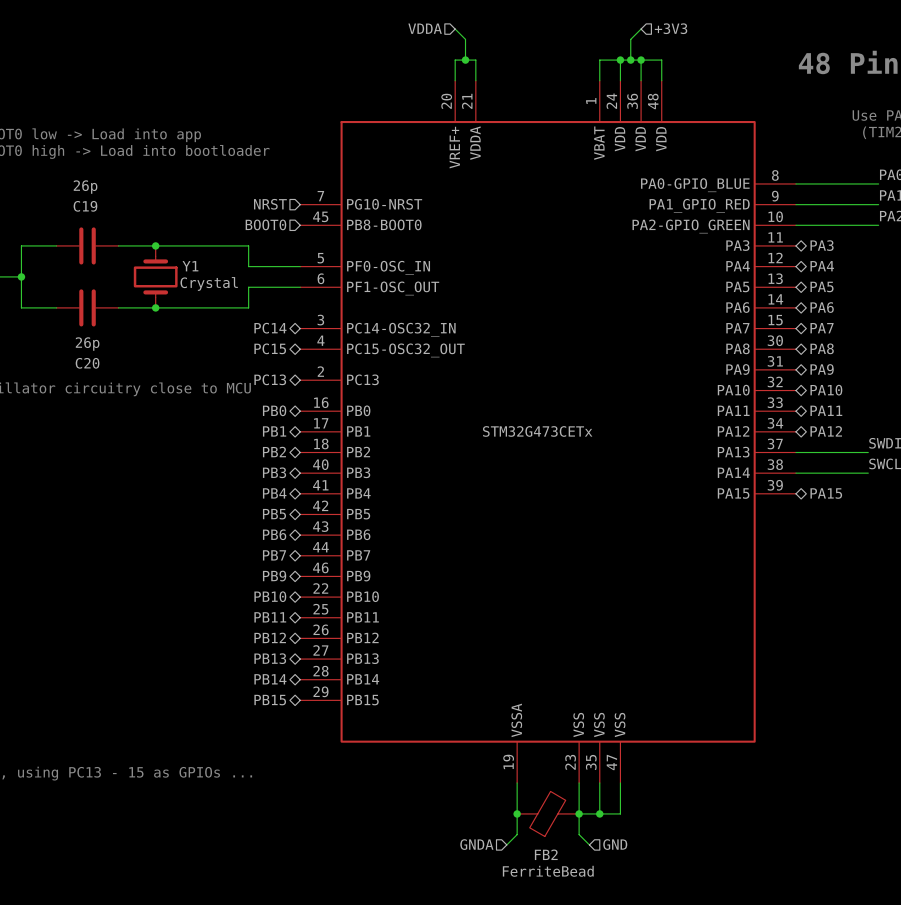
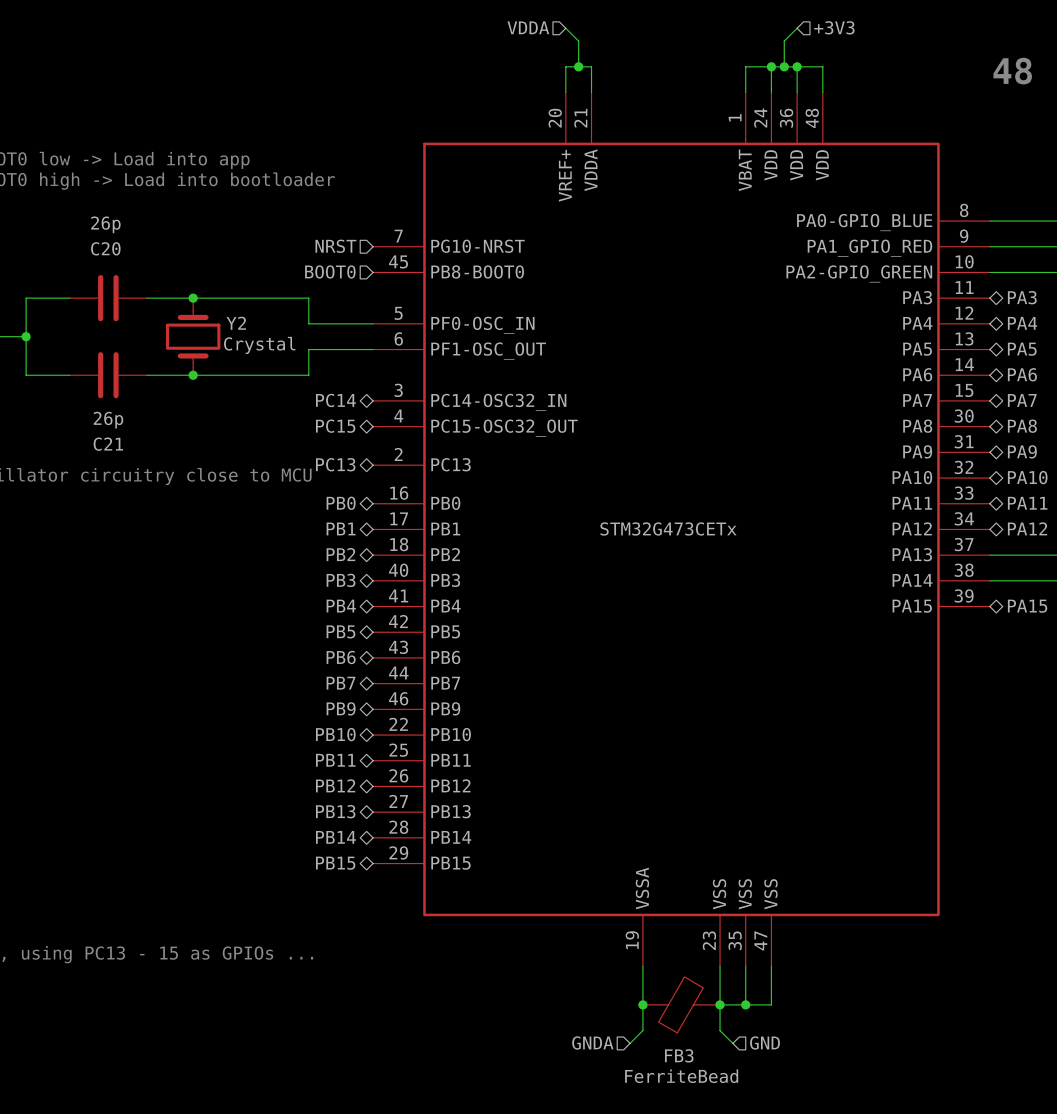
C19 name: C19 (85, 206) -> C20 (105, 248)
Y1 name: Y1 (190, 266) -> Y2 (236, 323)
C20 name: C20 (87, 363) -> C21 (108, 444)
FB2 name: FB2 (546, 854) -> FB3 (679, 1055)

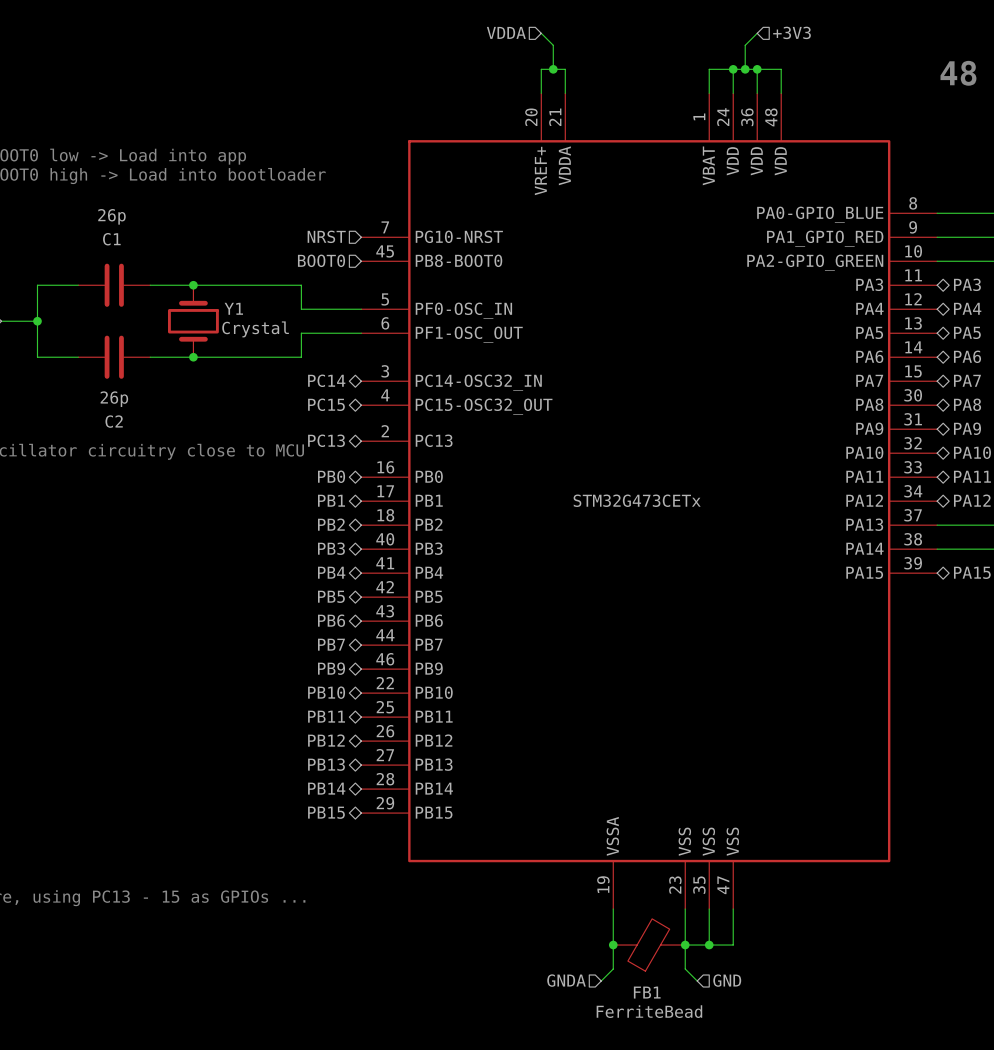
C20 name: C20 (105, 248) -> C1 (111, 239)
Y2 name: Y2 (236, 323) -> Y1 (233, 308)
C21 name: C21 (108, 444) -> C2 (114, 421)
FB3 name: FB3 (679, 1055) -> FB1 (647, 992)

